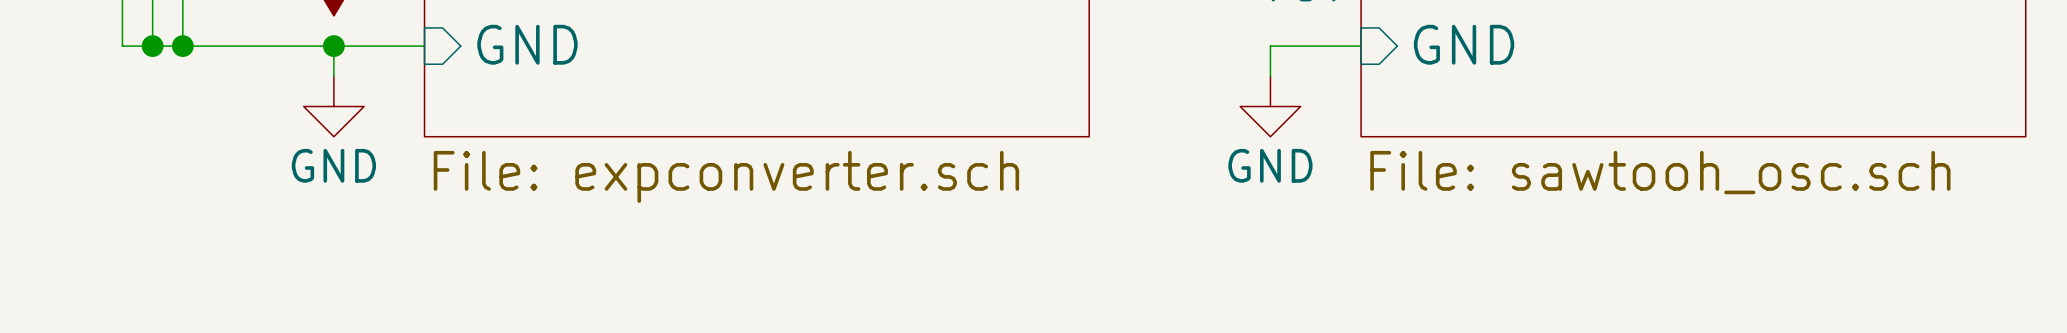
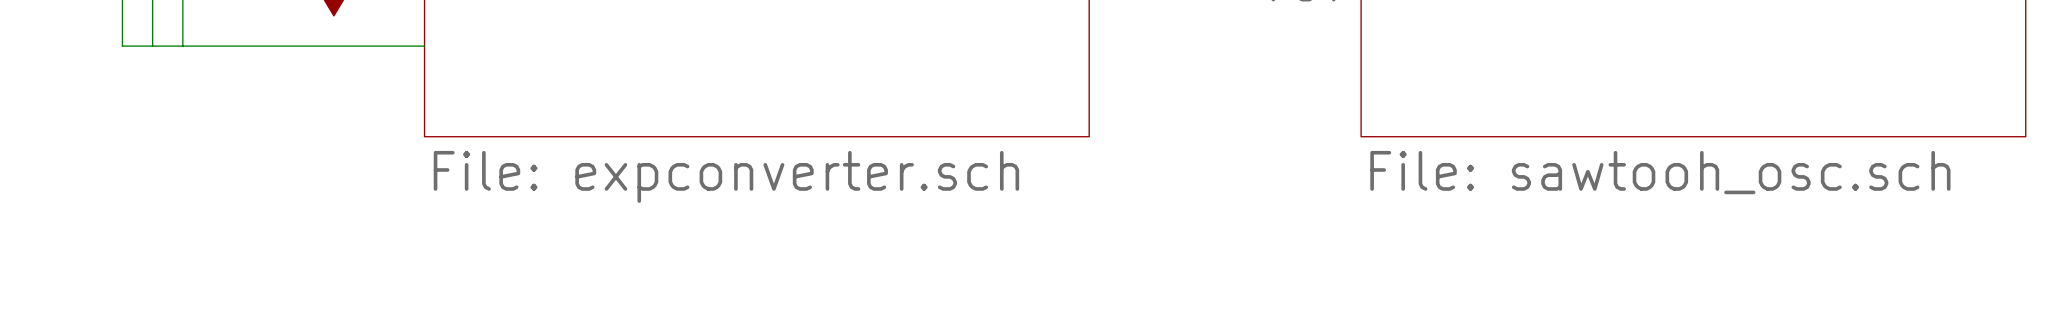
sheet pin: GND (527, 44) -> none
sheet pin: GND (1464, 44) -> none
junction: (152, 46) -> none
junction: (182, 46) -> none
wire: (333, 46) (333, 76) -> none
junction: (333, 46) -> none
wire: (1361, 46) (1270, 46) (1270, 76) -> none
power symbol: GND (333, 106) -> none
power symbol: GND (1270, 106) -> none

